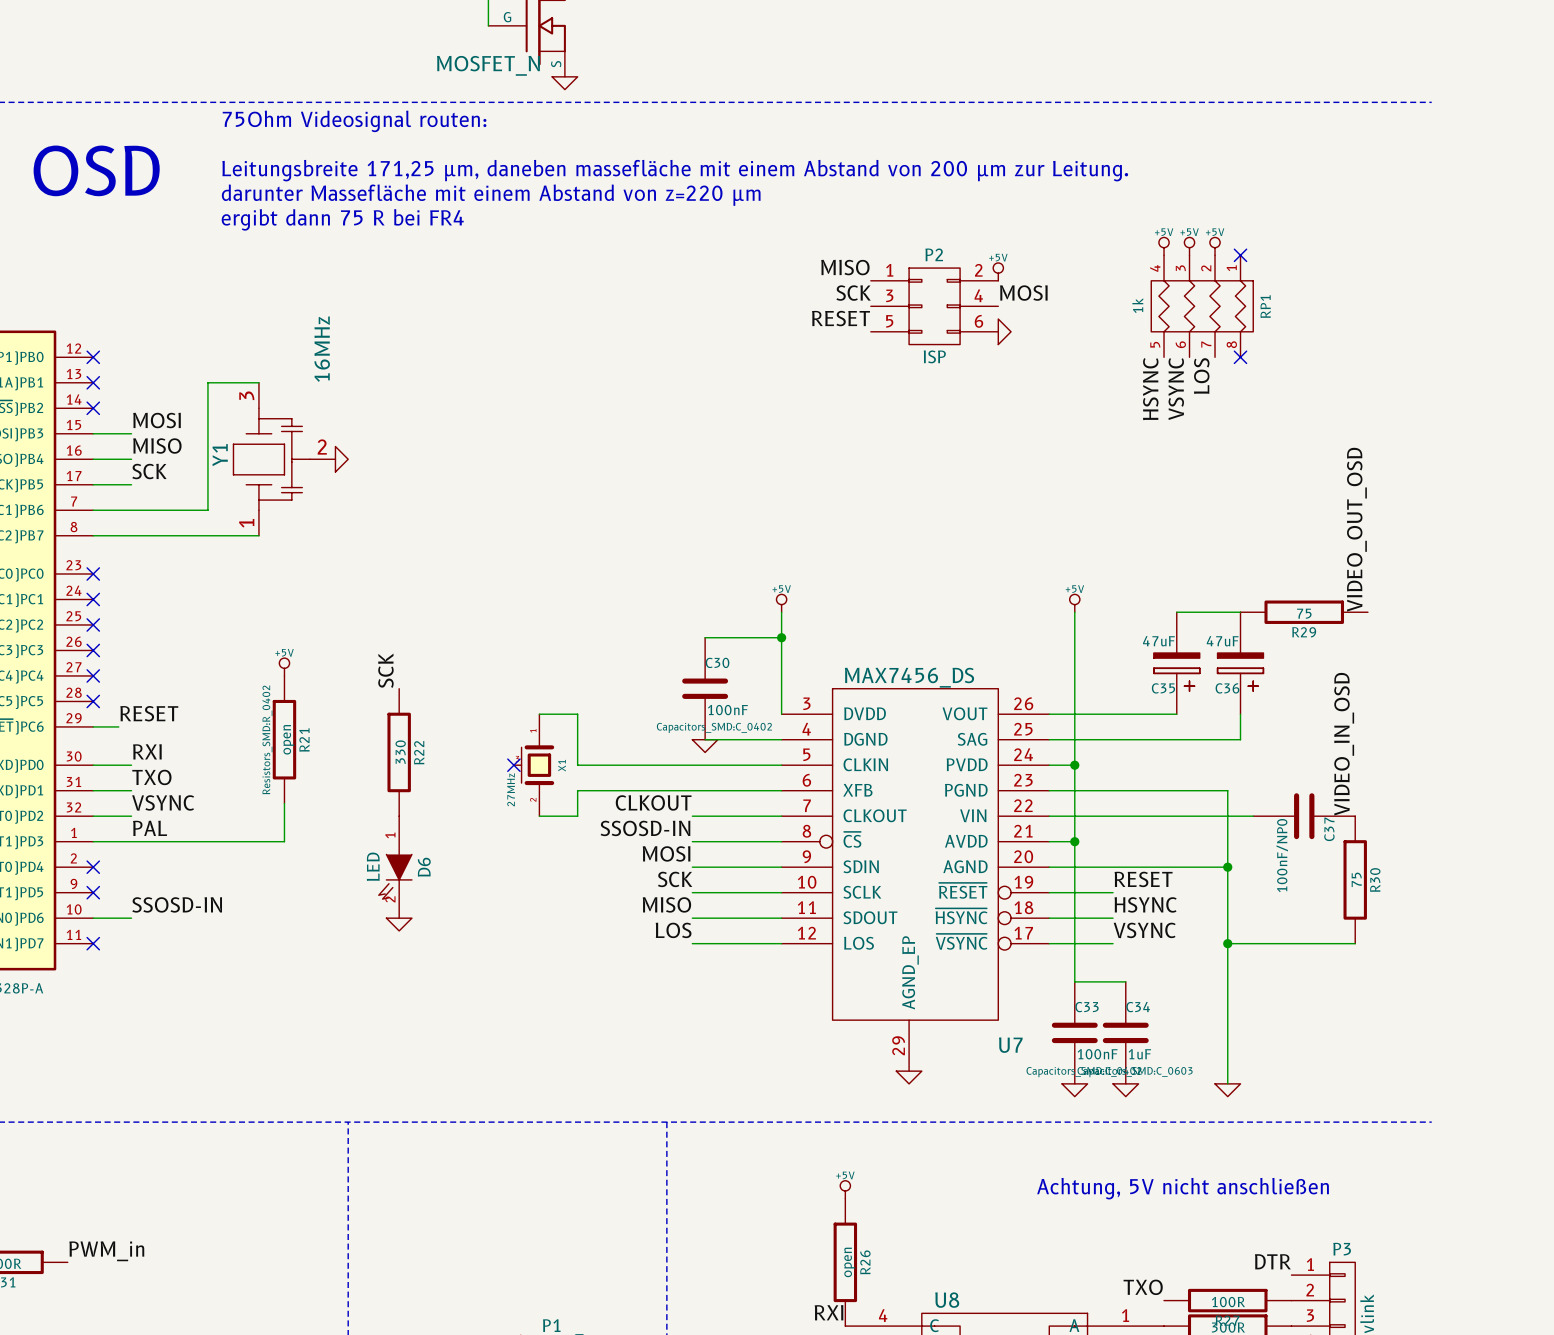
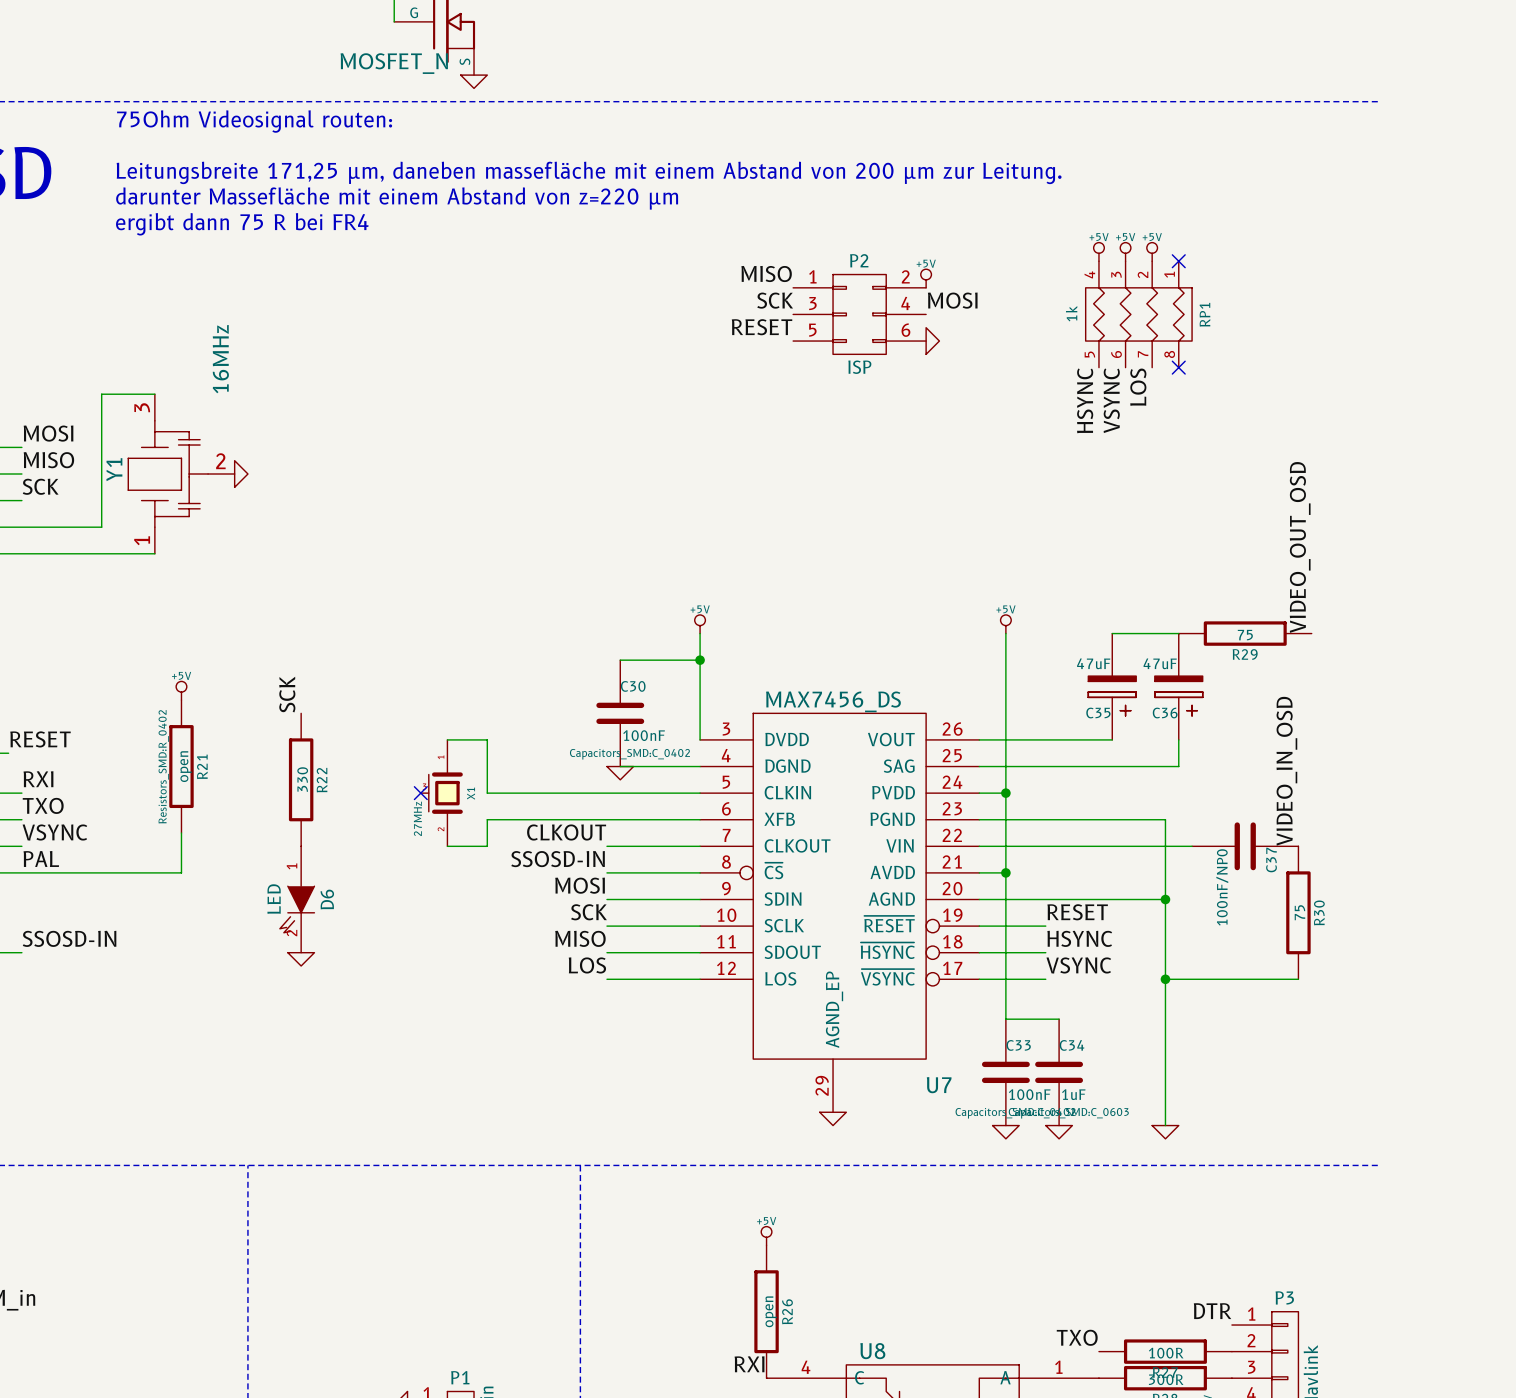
text: Achtung, 5V nicht anschließen (1183, 1188) -> none

